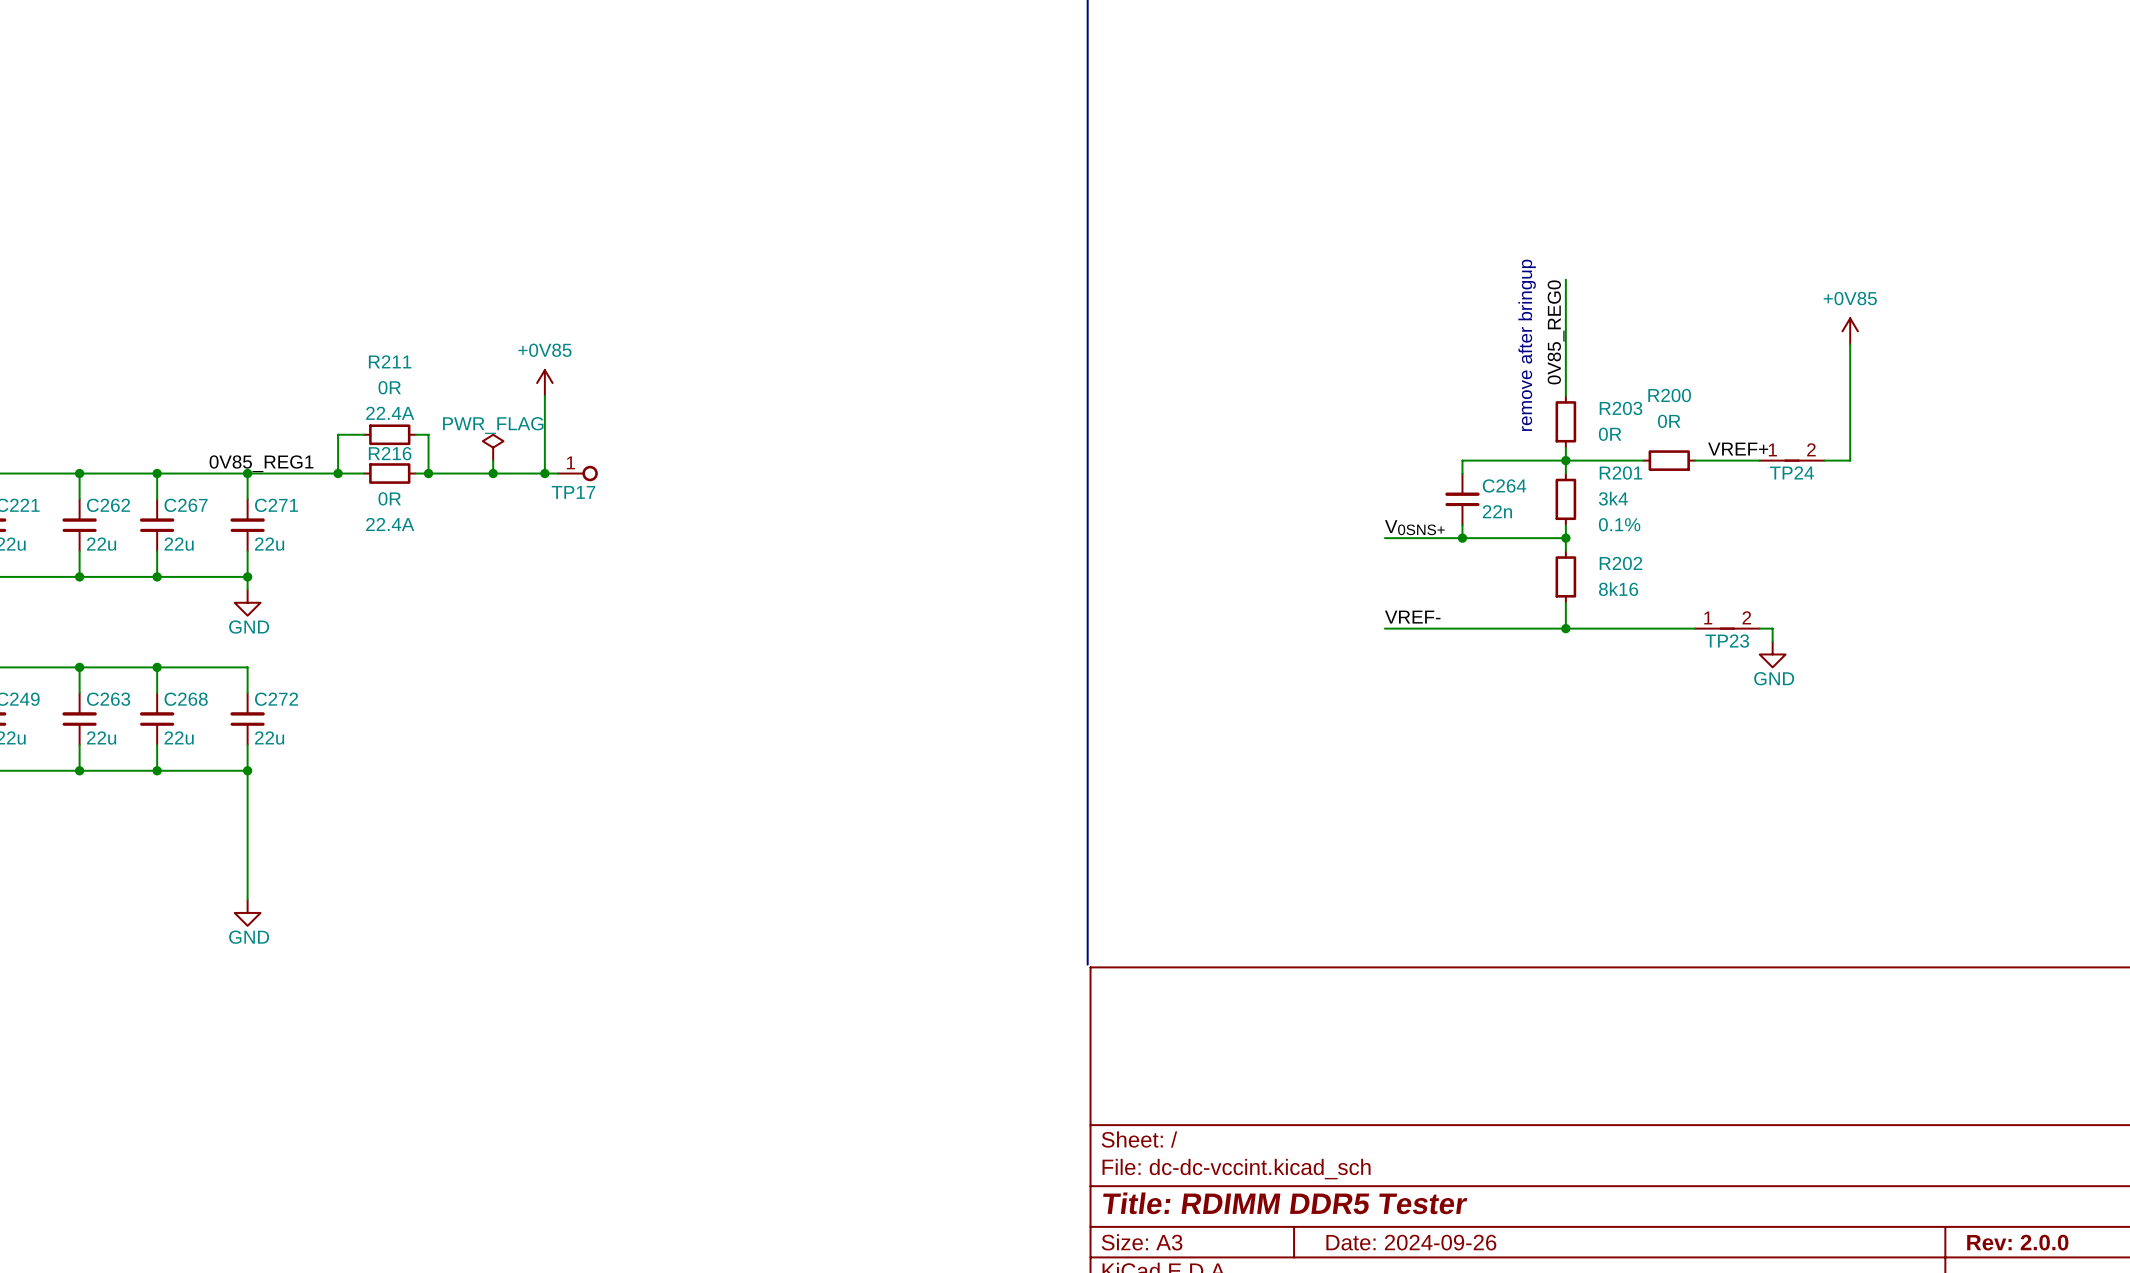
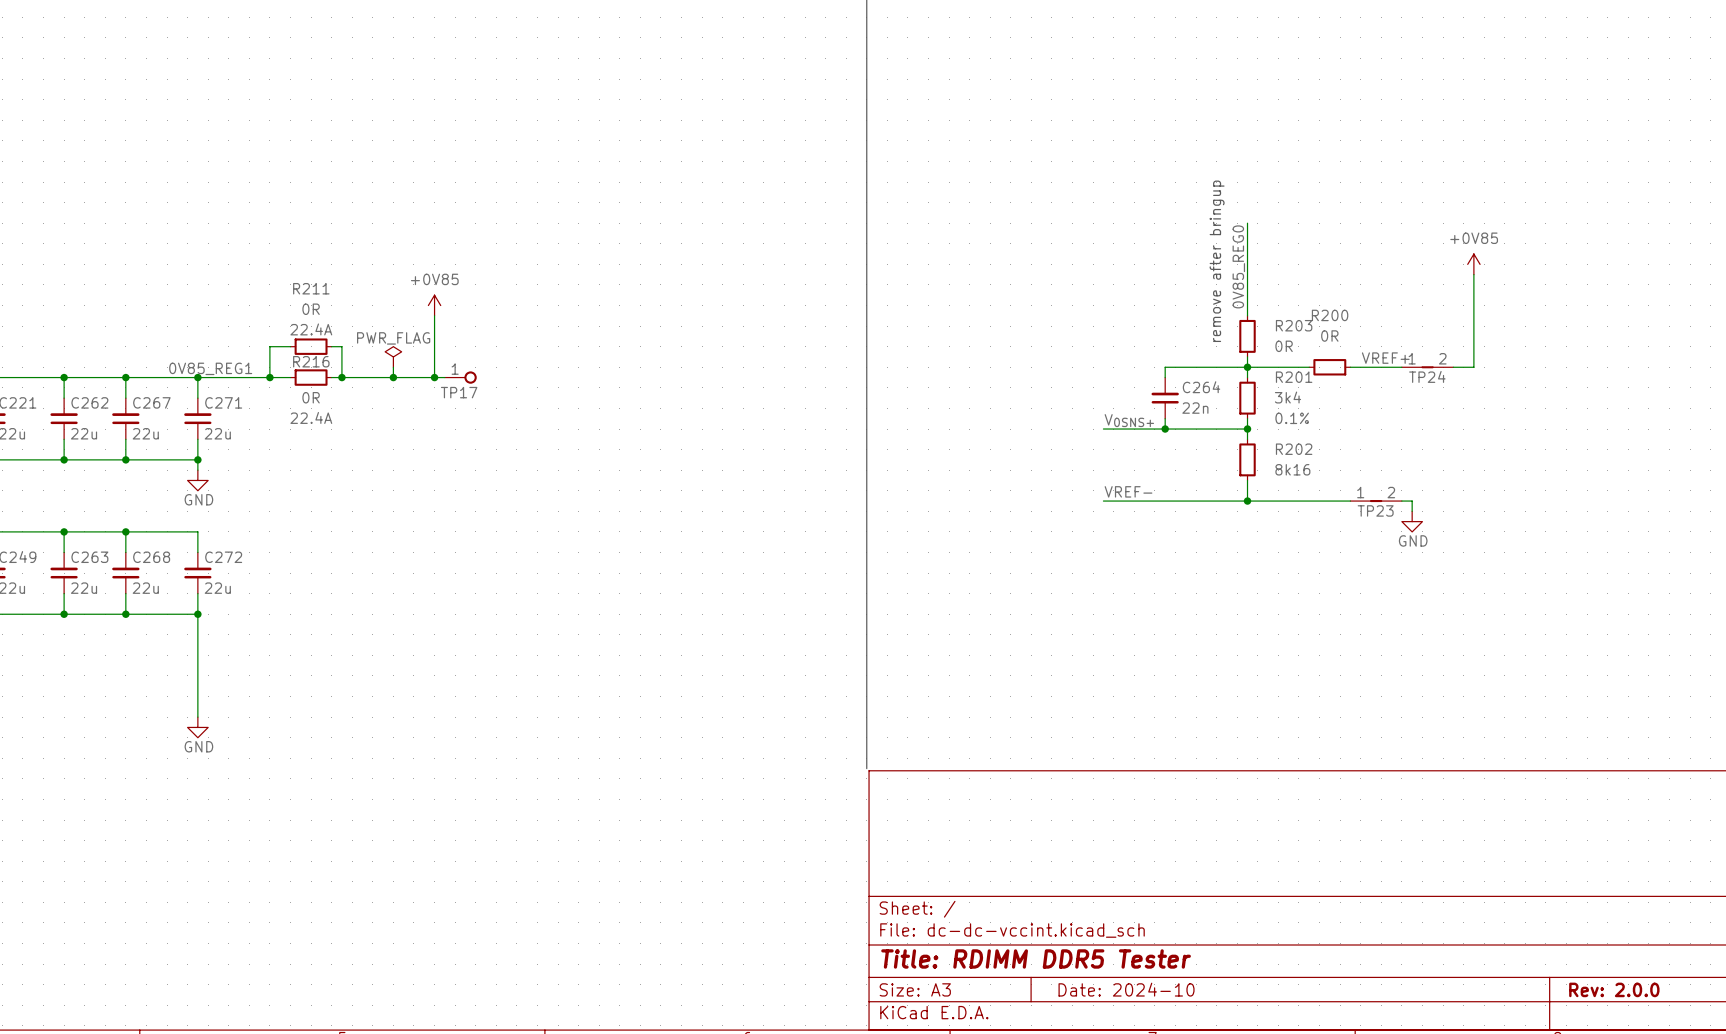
title block: Date: 2024-09-26 (1411, 1242) -> Date: 2024-10 (1126, 989)

